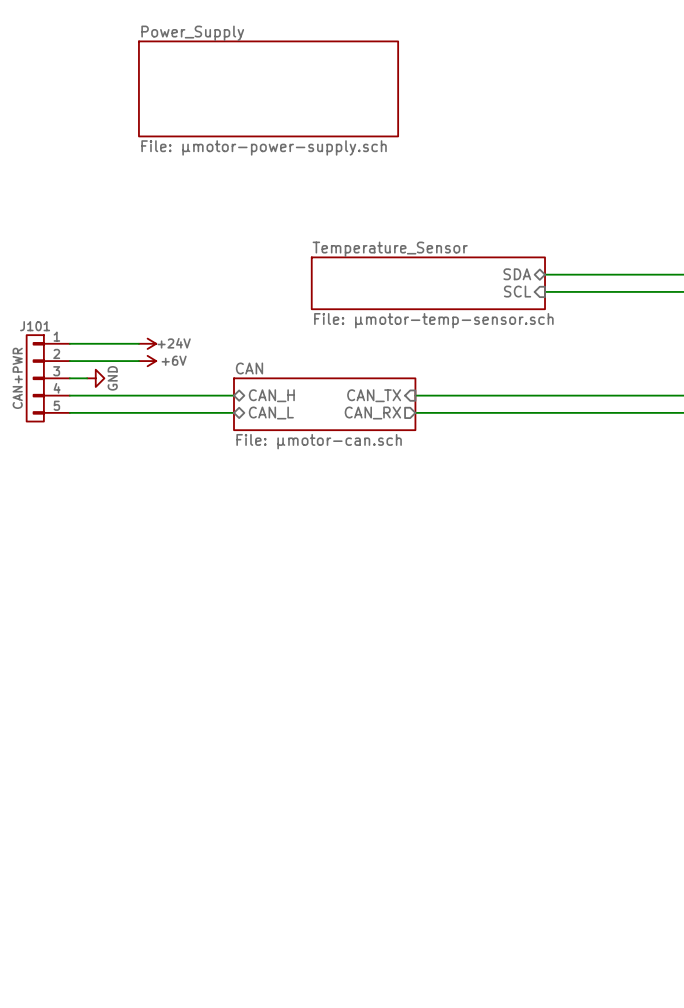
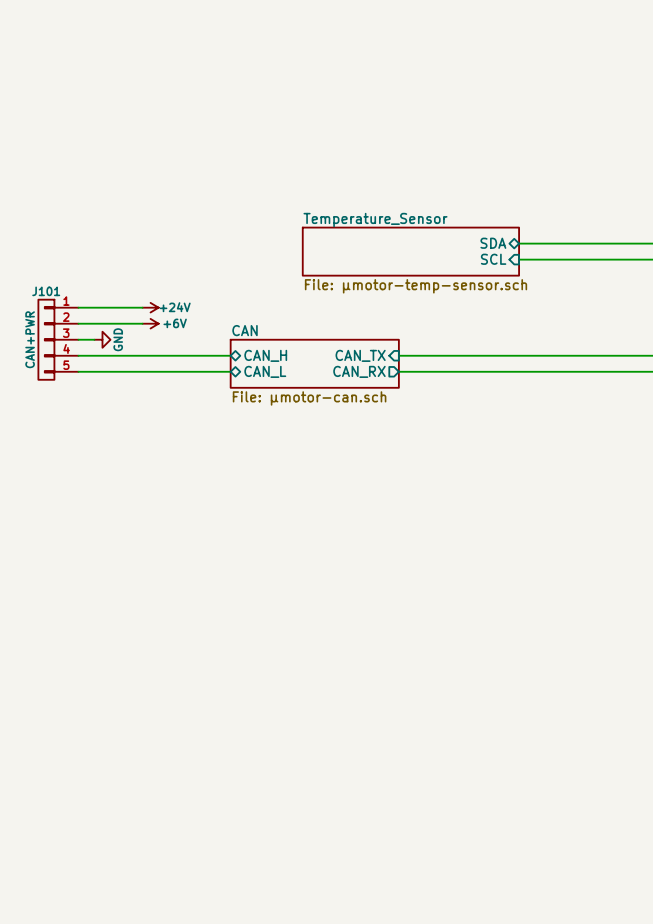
sheet Power_Supply: File: µmotor-power-supply.sch (268, 88) -> none

